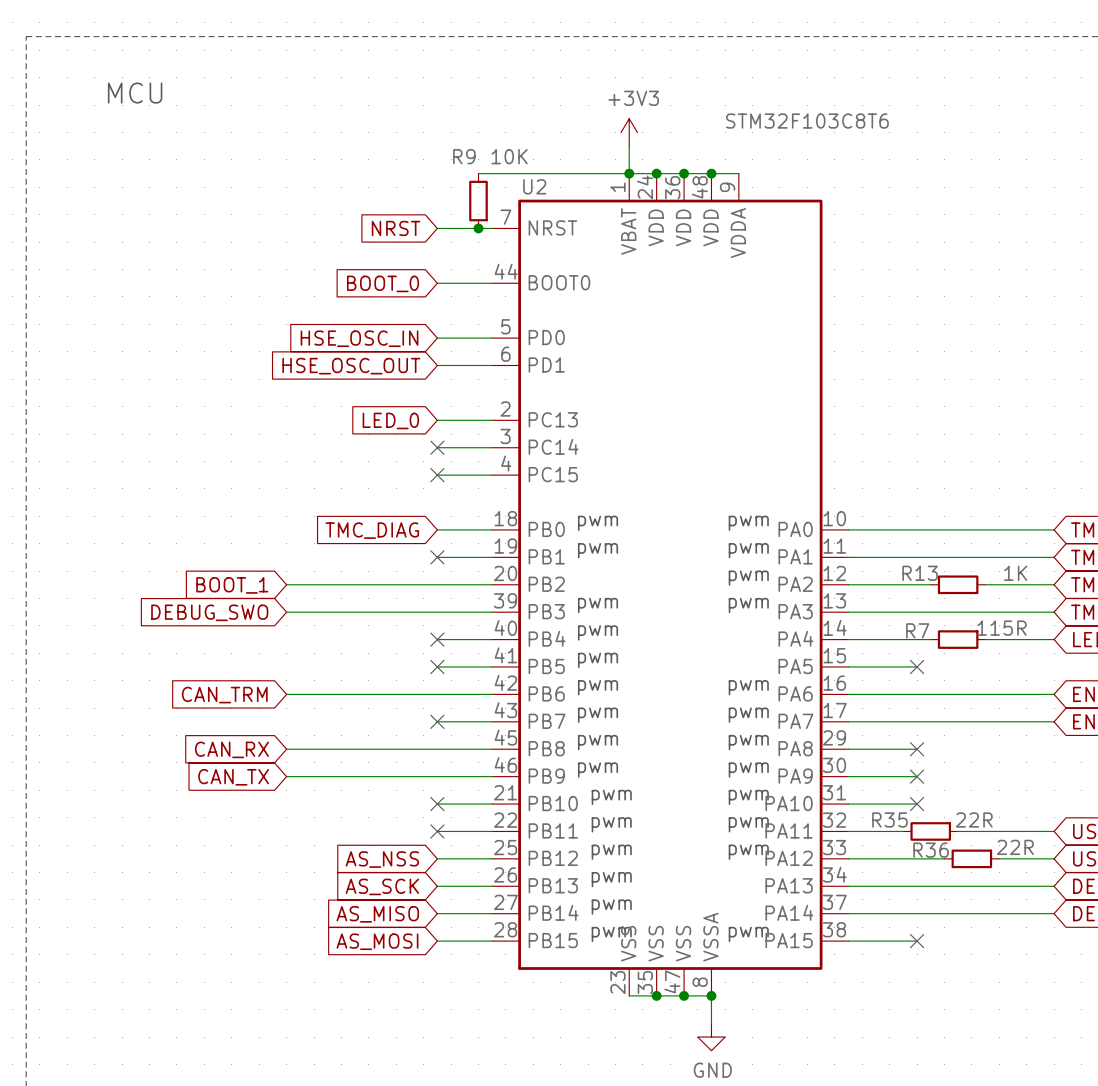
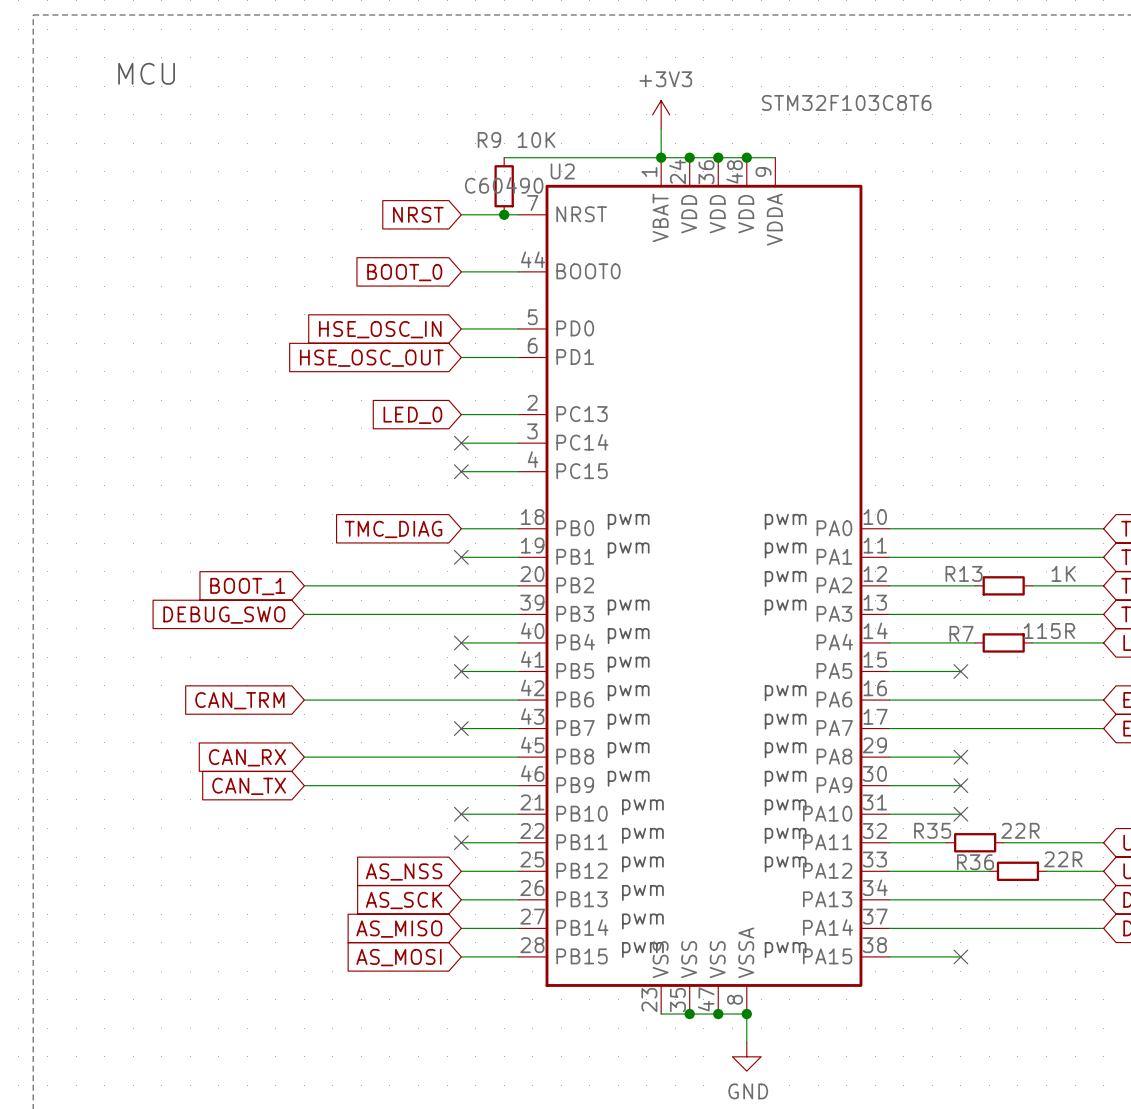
R9 text: none -> C60490 (504, 185)

